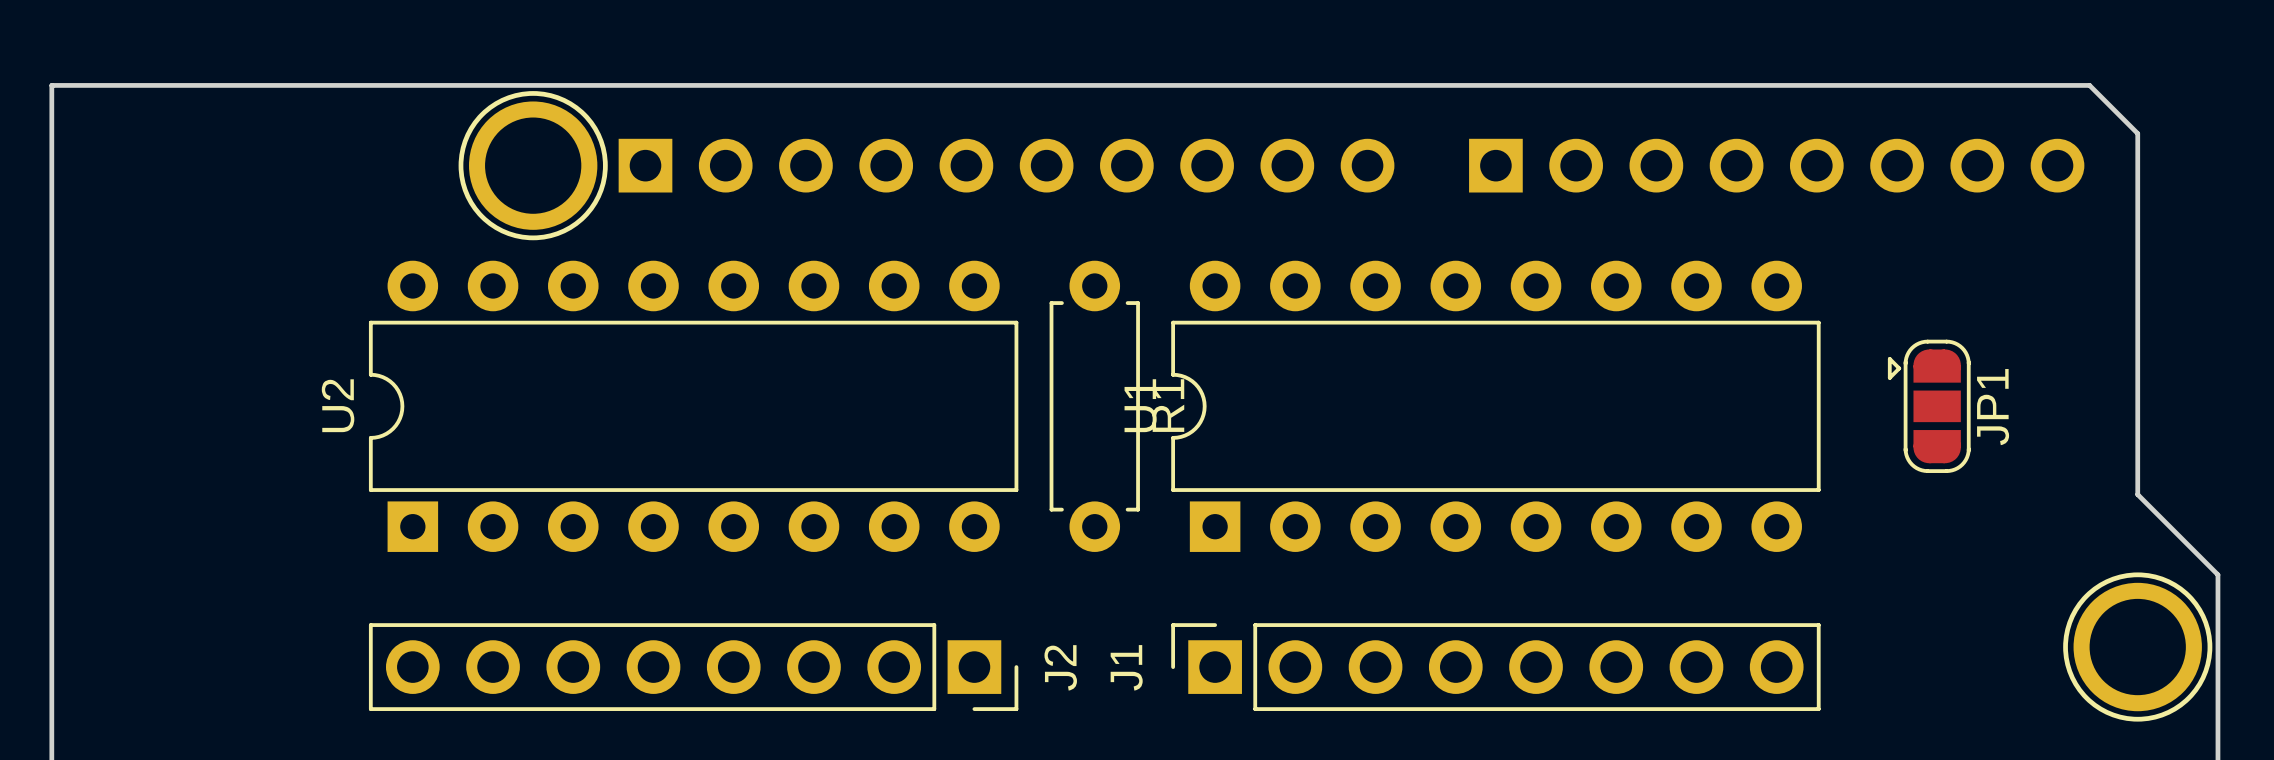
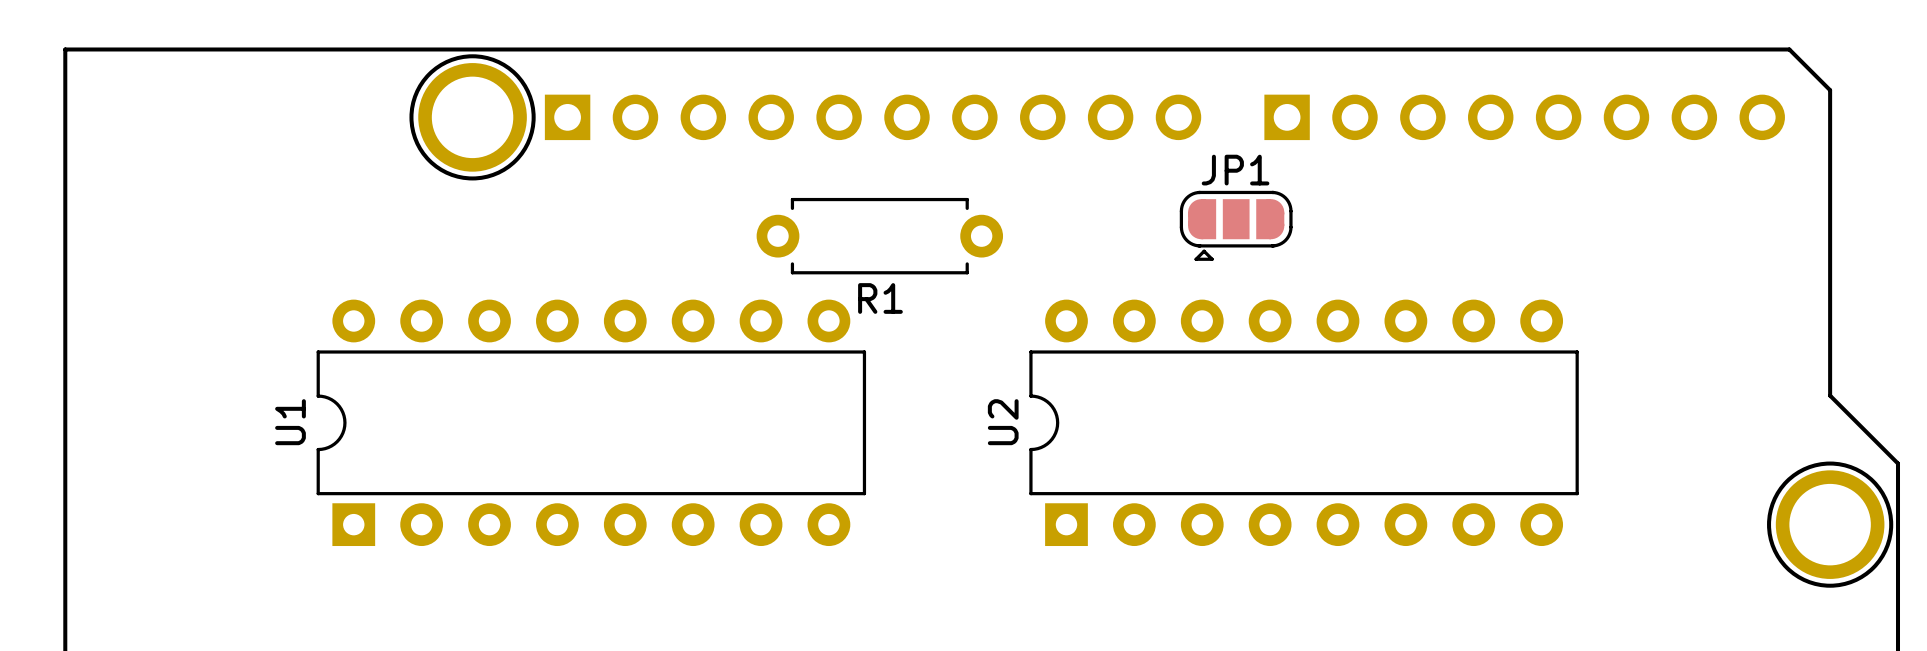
U2 position: (693, 406) -> (1304, 422)
R1 rotation: 0° (1094, 406) -> 90° clockwise (879, 236)
U1 position: (1495, 406) -> (591, 422)
JP1 rotation: 0° (1929, 406) -> 90° counterclockwise (1236, 225)
JP1 position: (1929, 406) -> (1236, 225)
J2: (693, 667) -> none
J1: (1495, 667) -> none

